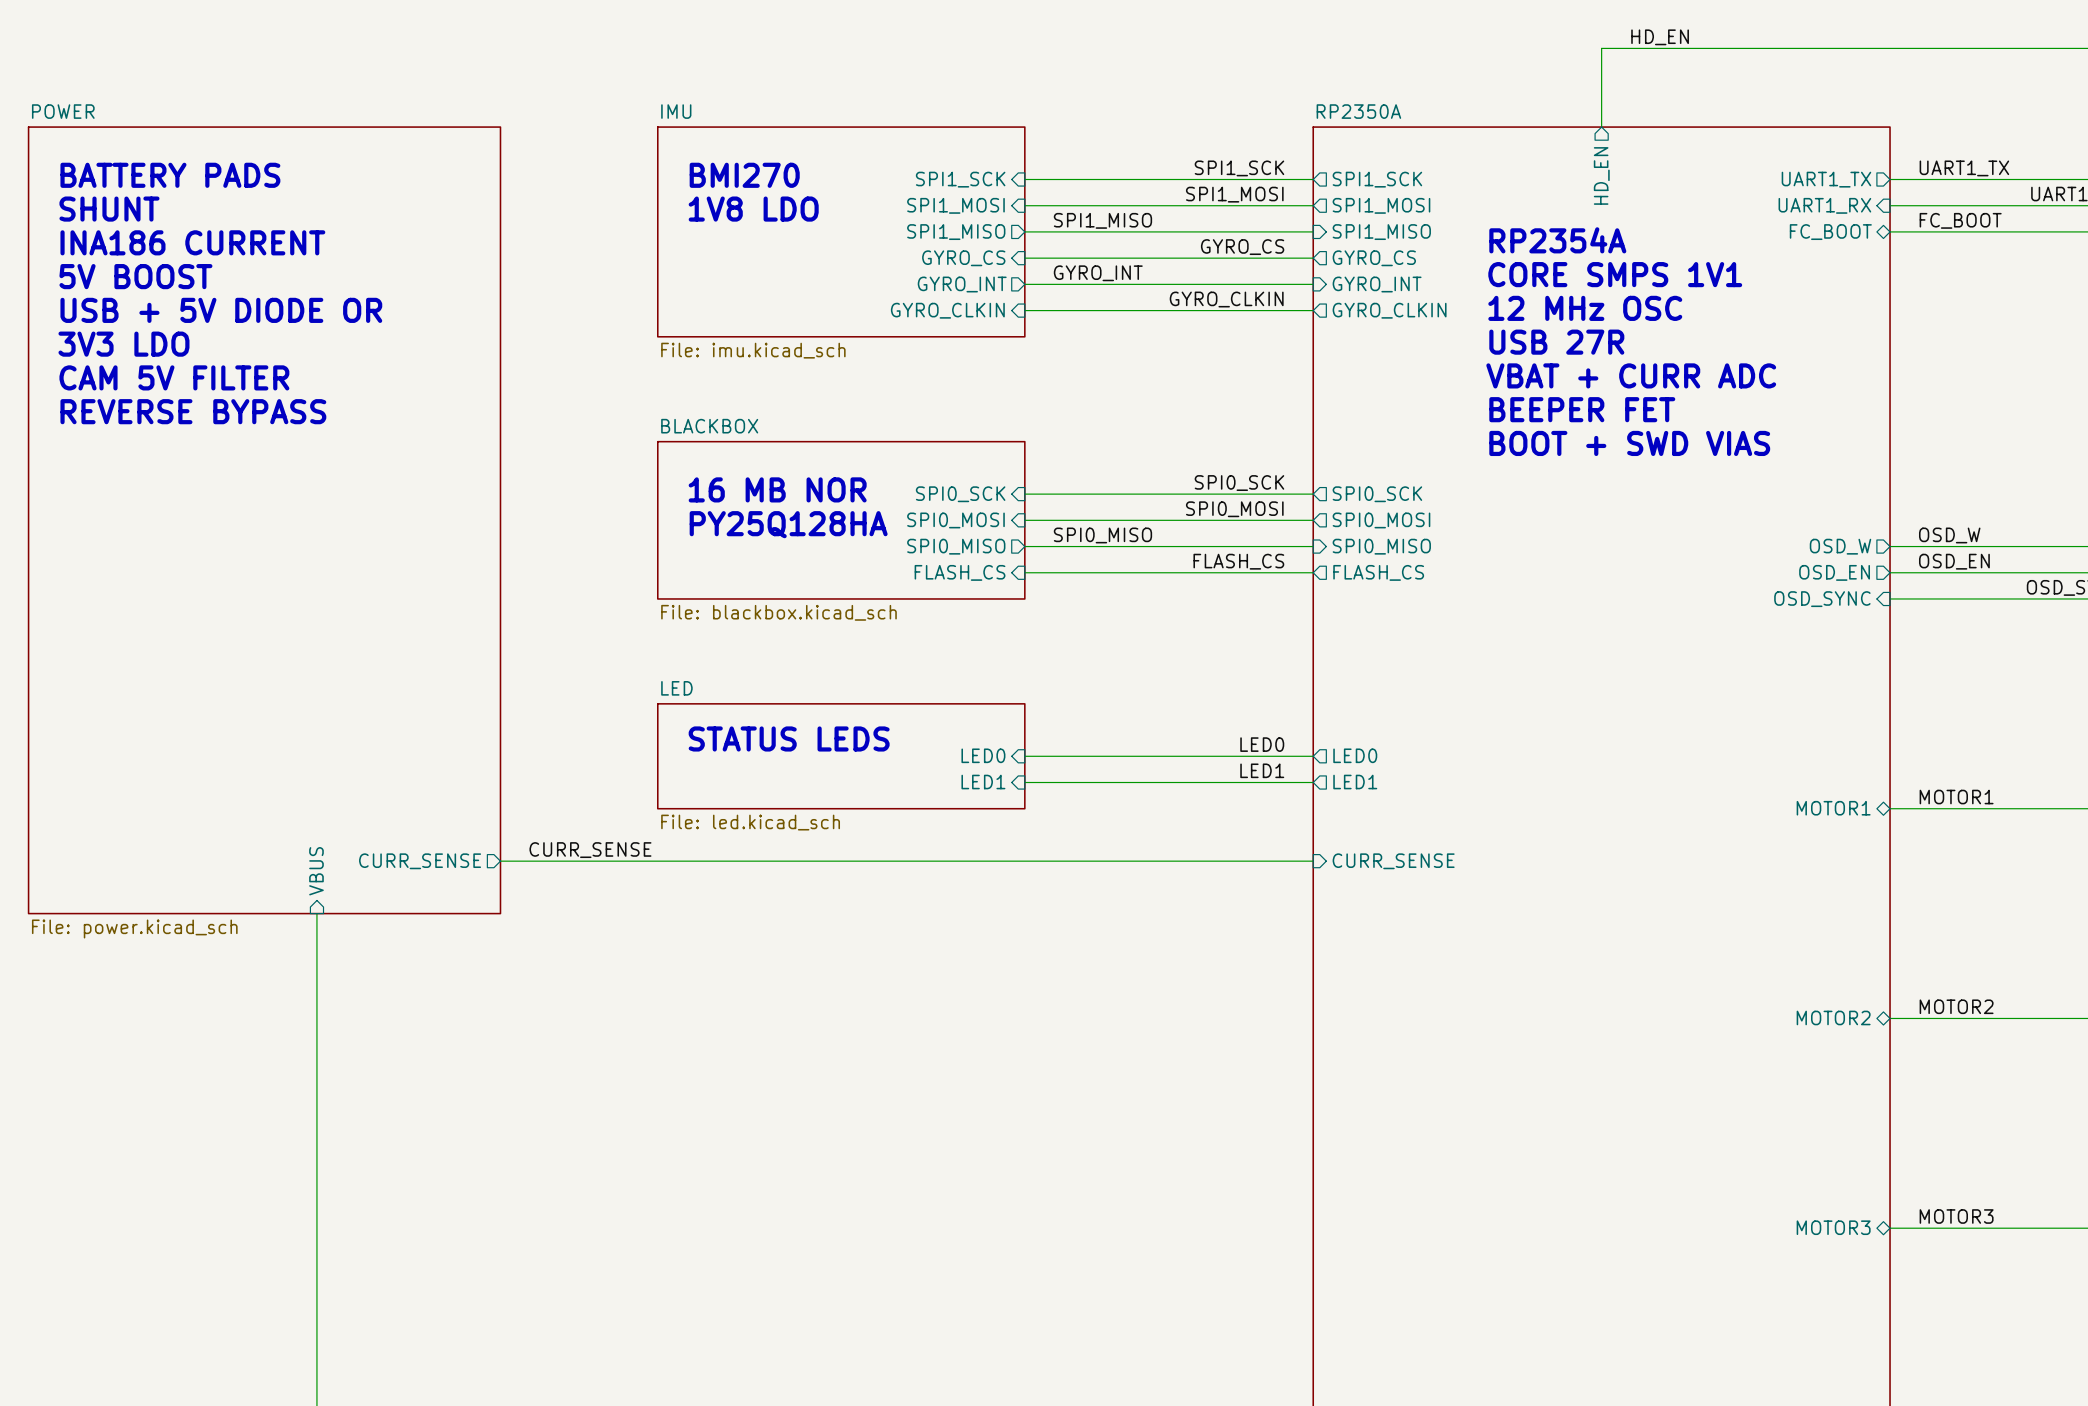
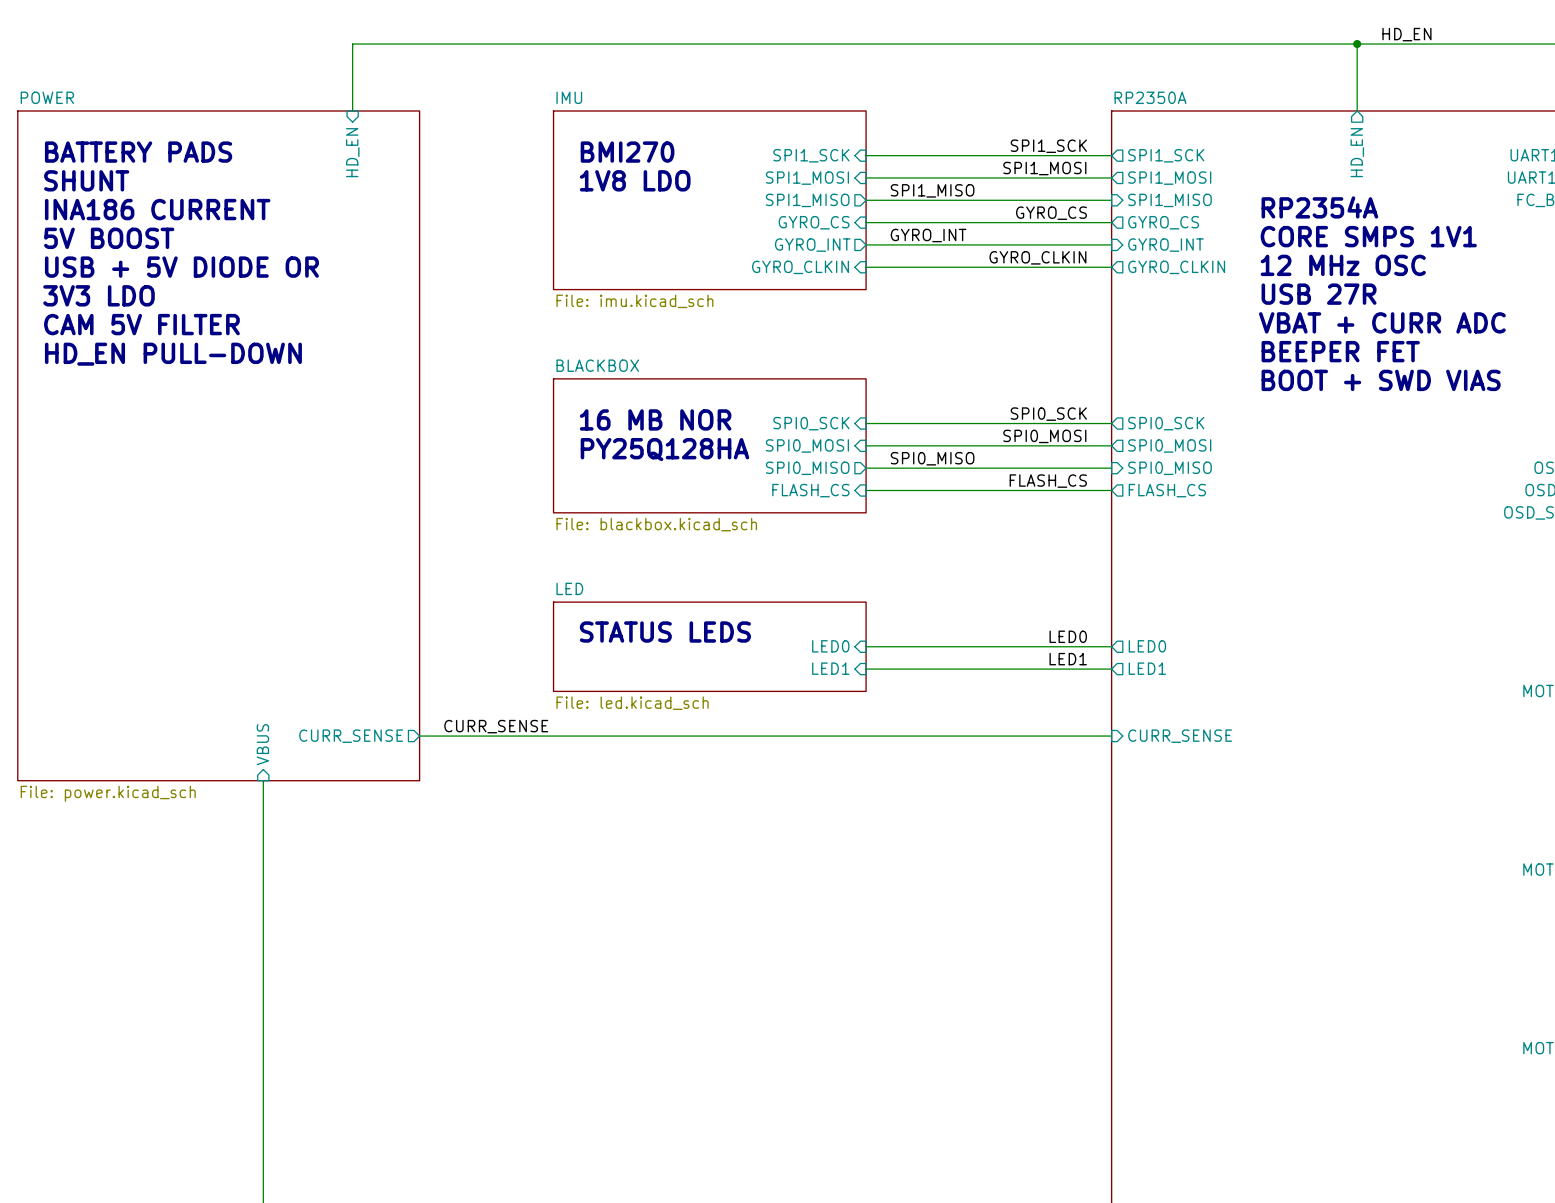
wire: none -> (1357, 44) (352, 44) (352, 111)
junction: none -> (1357, 44)
sheet pin: none -> HD_EN (352, 152)
text: REVERSE BYPASS (193, 411) -> HD_EN PULL-DOWN (173, 354)

